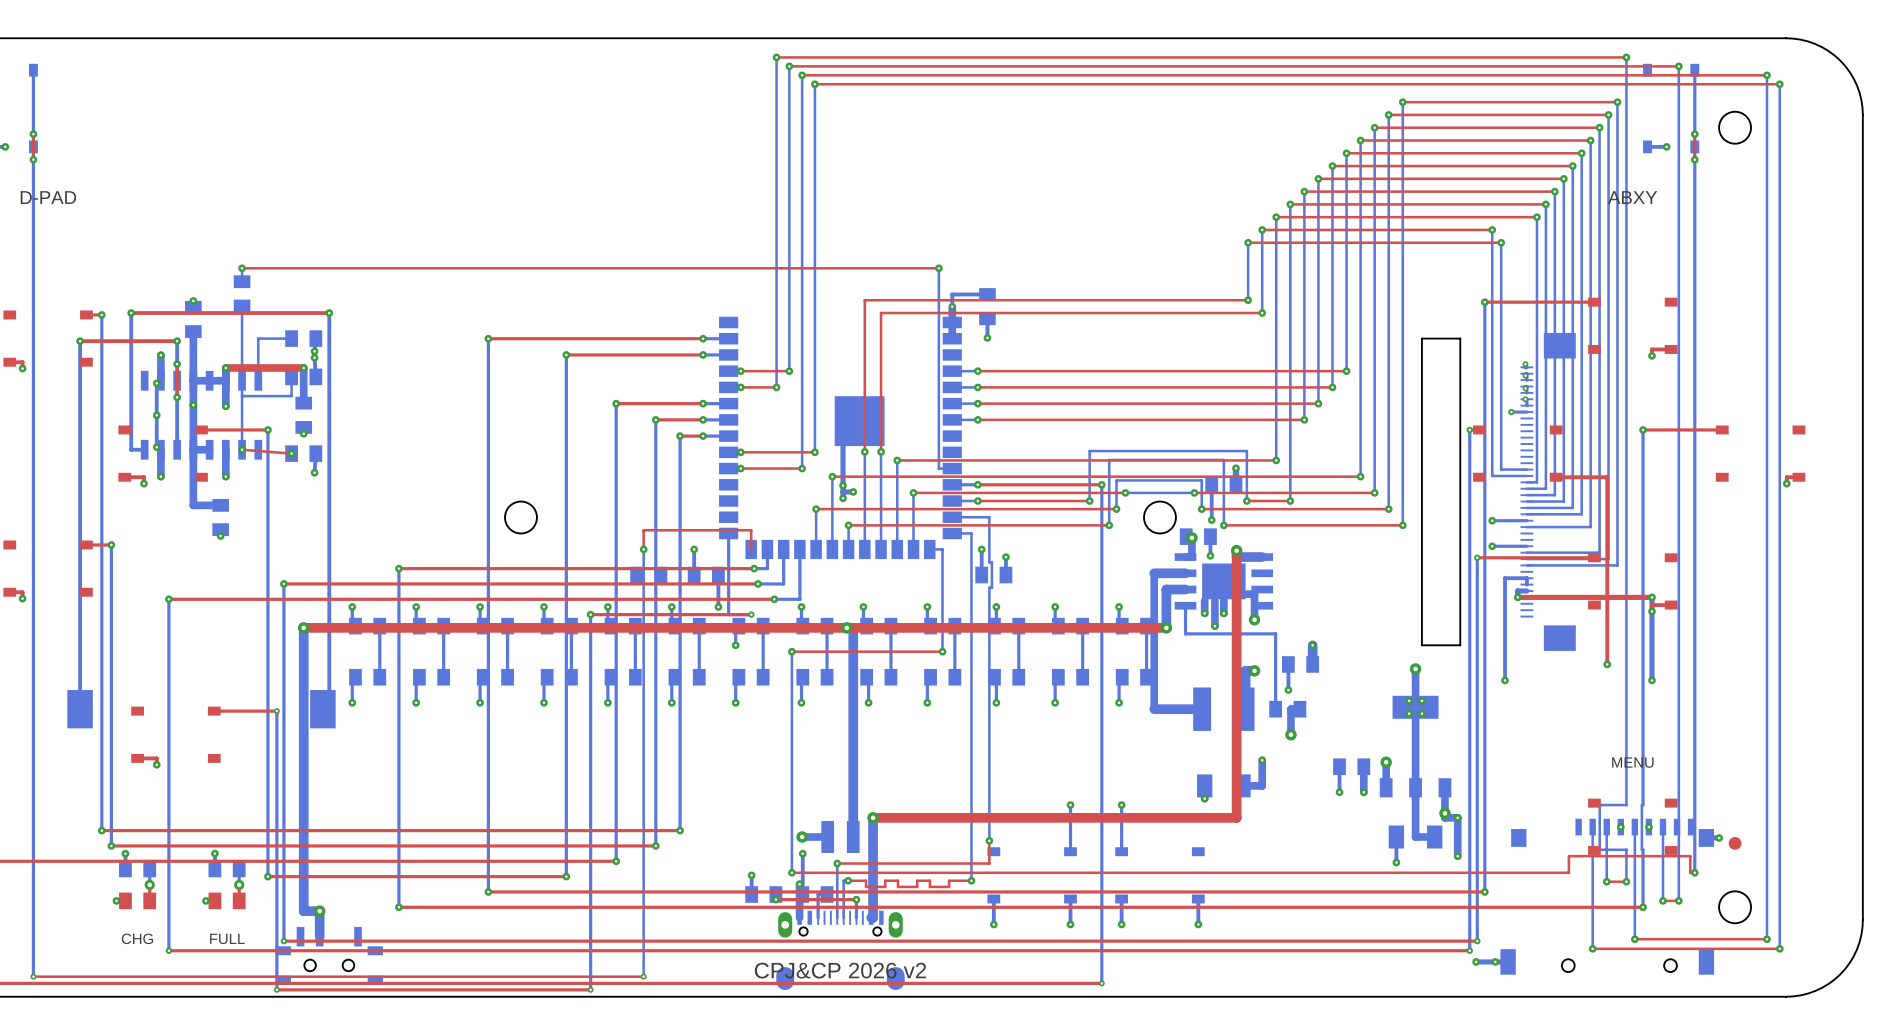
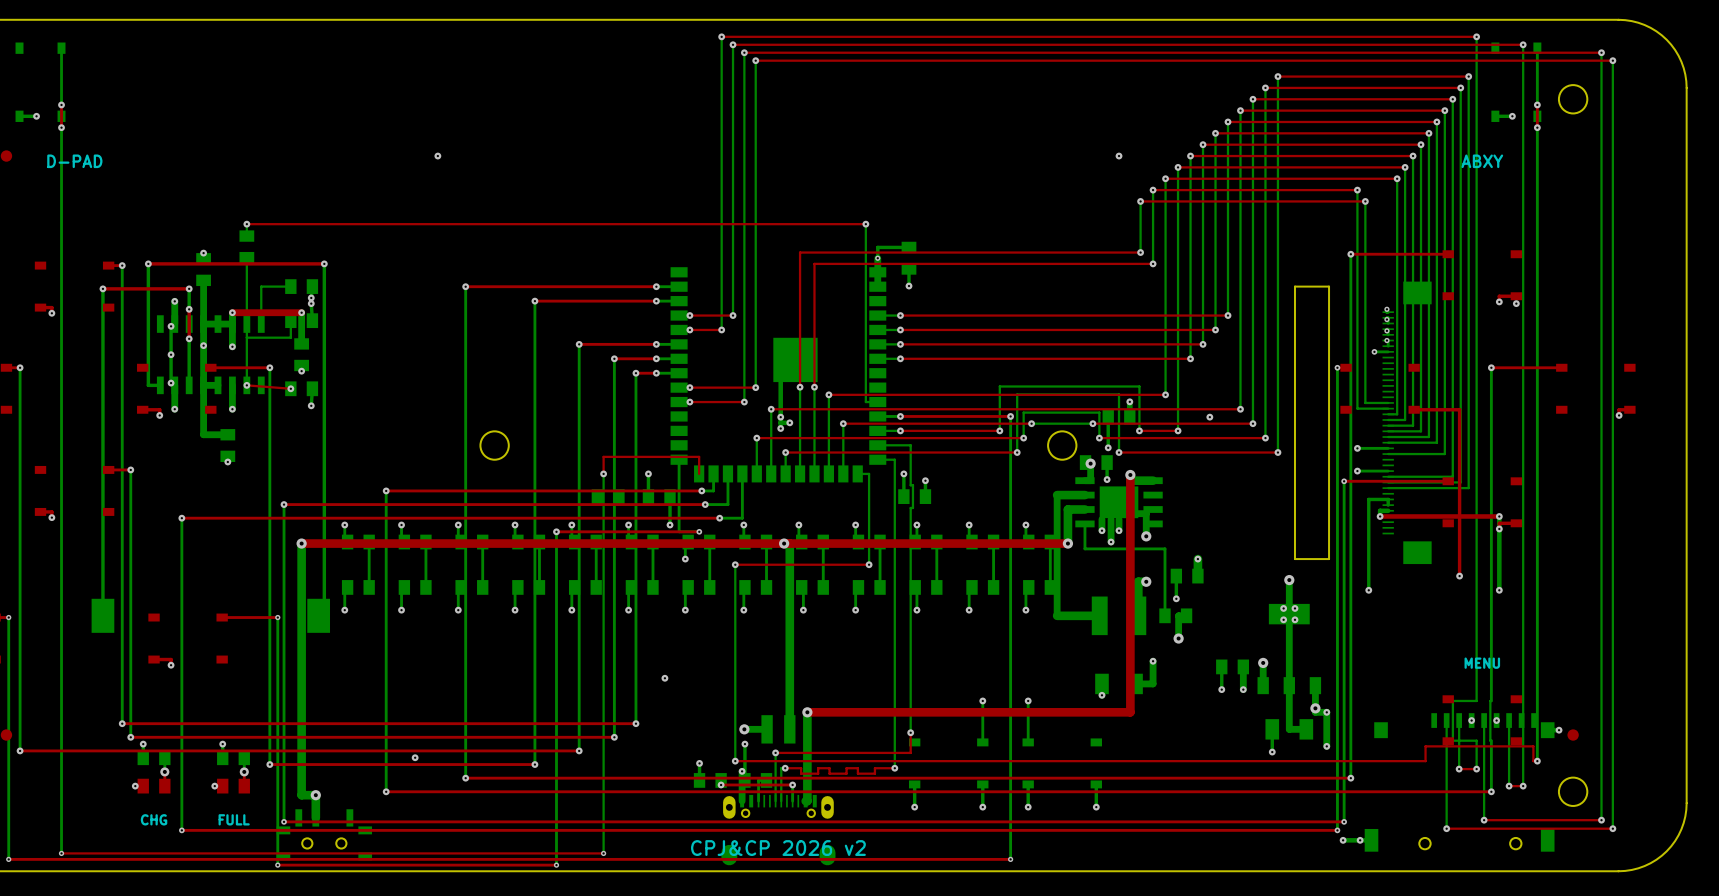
via: none -> (437, 156)
via: none -> (1119, 156)
via: none -> (1516, 303)
via: none -> (1209, 417)
via: none -> (664, 678)
via: none -> (415, 757)

